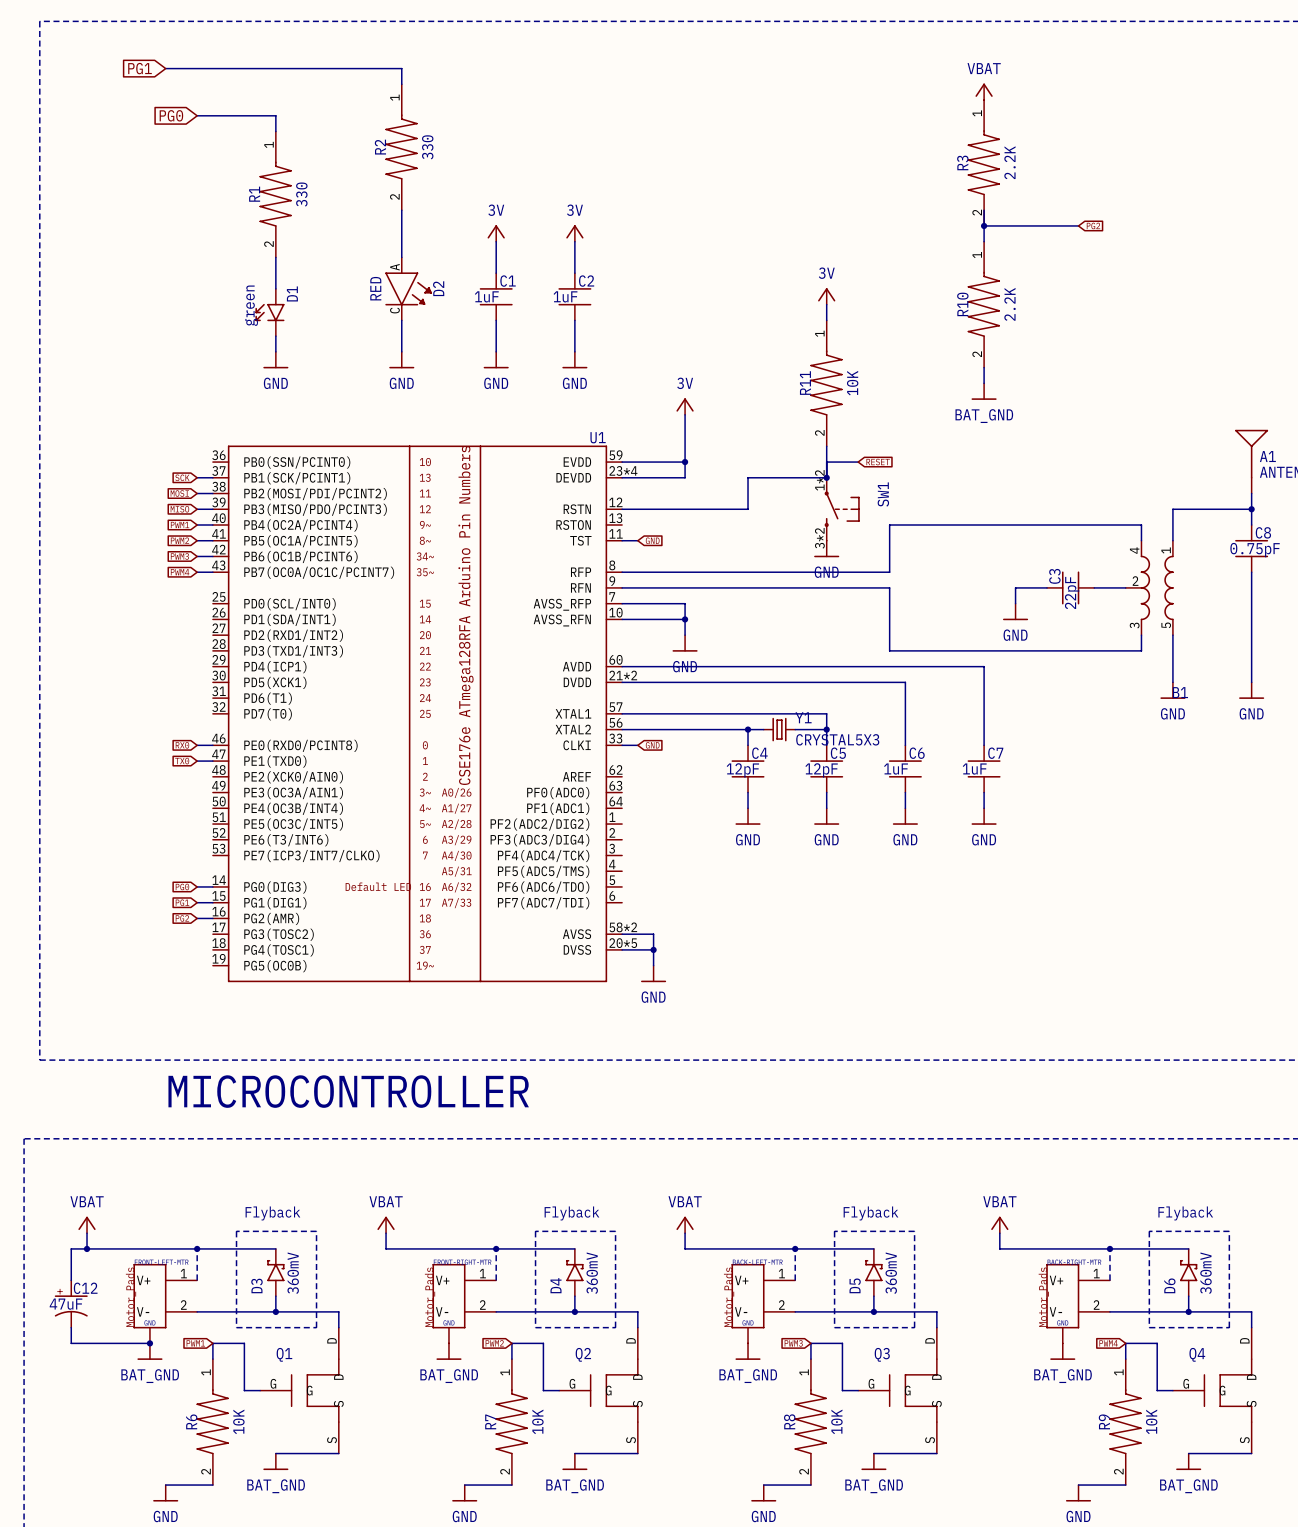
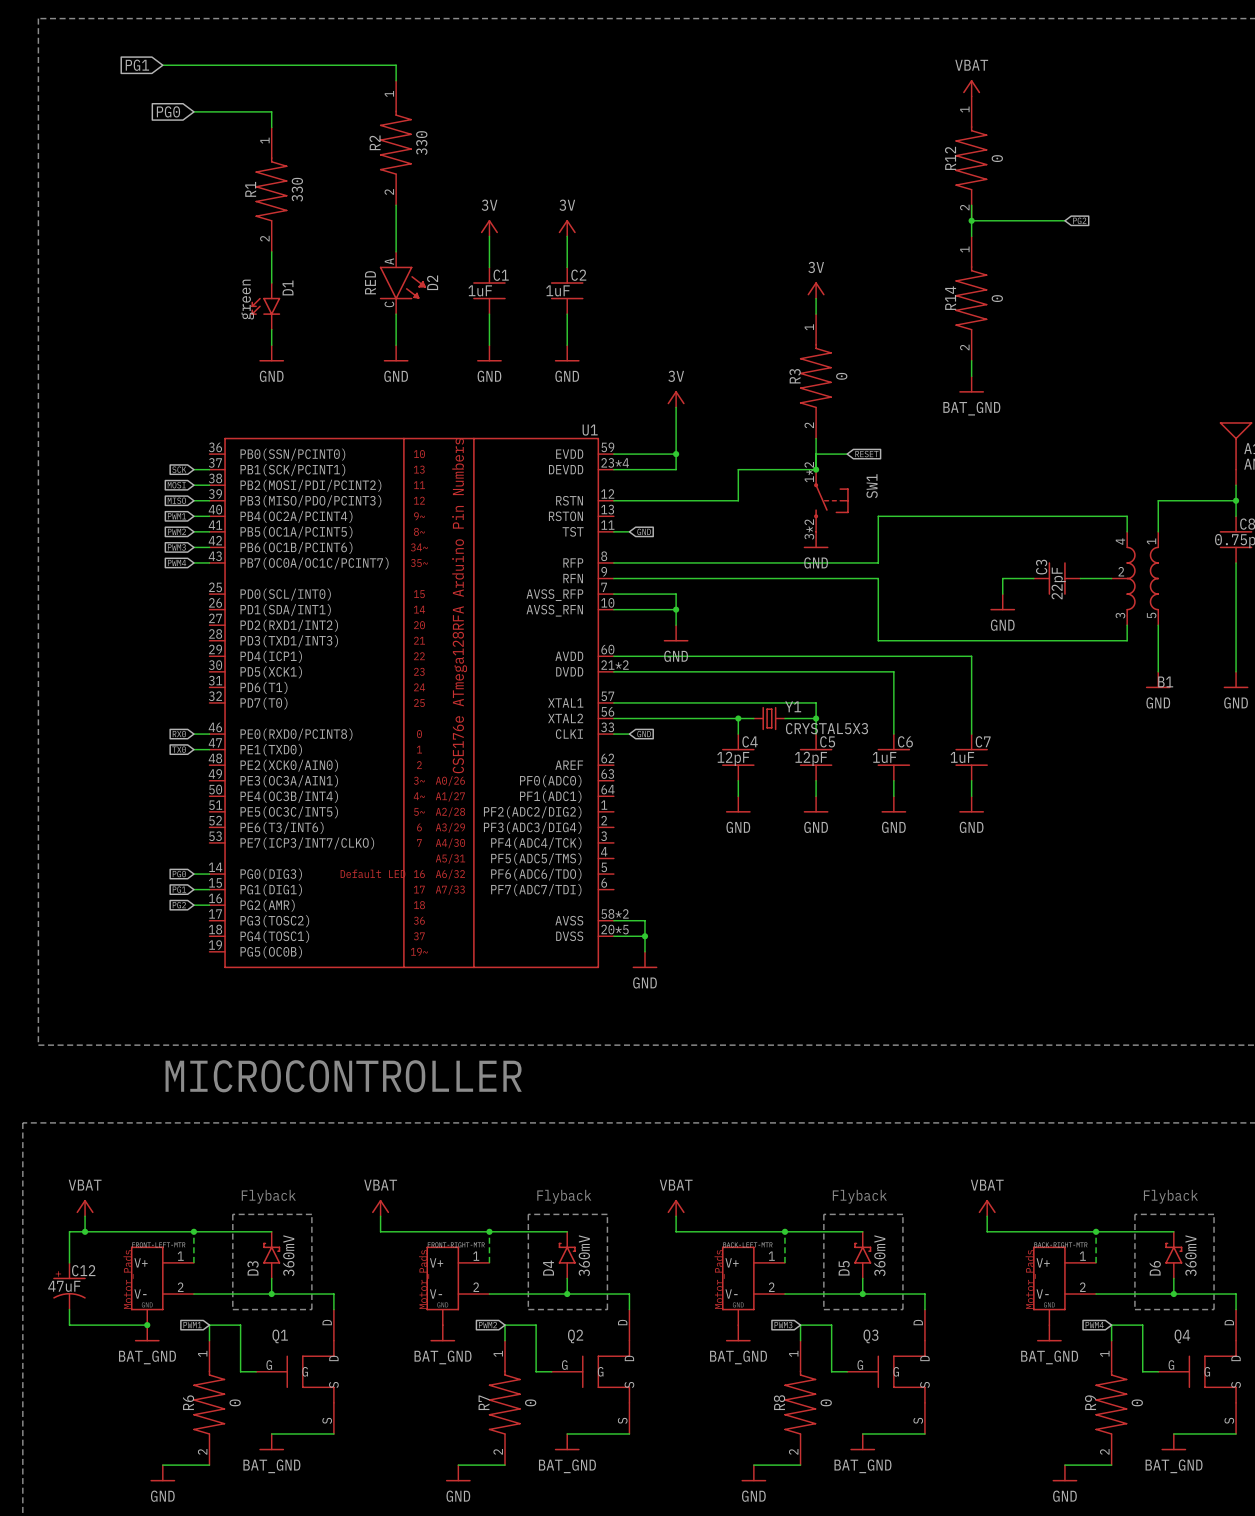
R3 name: R3 (962, 162) -> R12 (950, 158)
R3 value: 2.2K (1010, 162) -> 0 (997, 158)
R10 name: R10 (962, 304) -> R14 (950, 298)
R10 value: 2.2K (1010, 304) -> 0 (997, 298)
R11 name: R11 (805, 383) -> R3 (795, 376)
R11 value: 10K (852, 383) -> 0 (841, 376)
R6 value: 10K (238, 1421) -> 0 (235, 1402)
R7 value: 10K (537, 1421) -> 0 (530, 1402)
R8 value: 10K (836, 1421) -> 0 (826, 1402)
R9 value: 10K (1151, 1421) -> 0 (1137, 1402)

